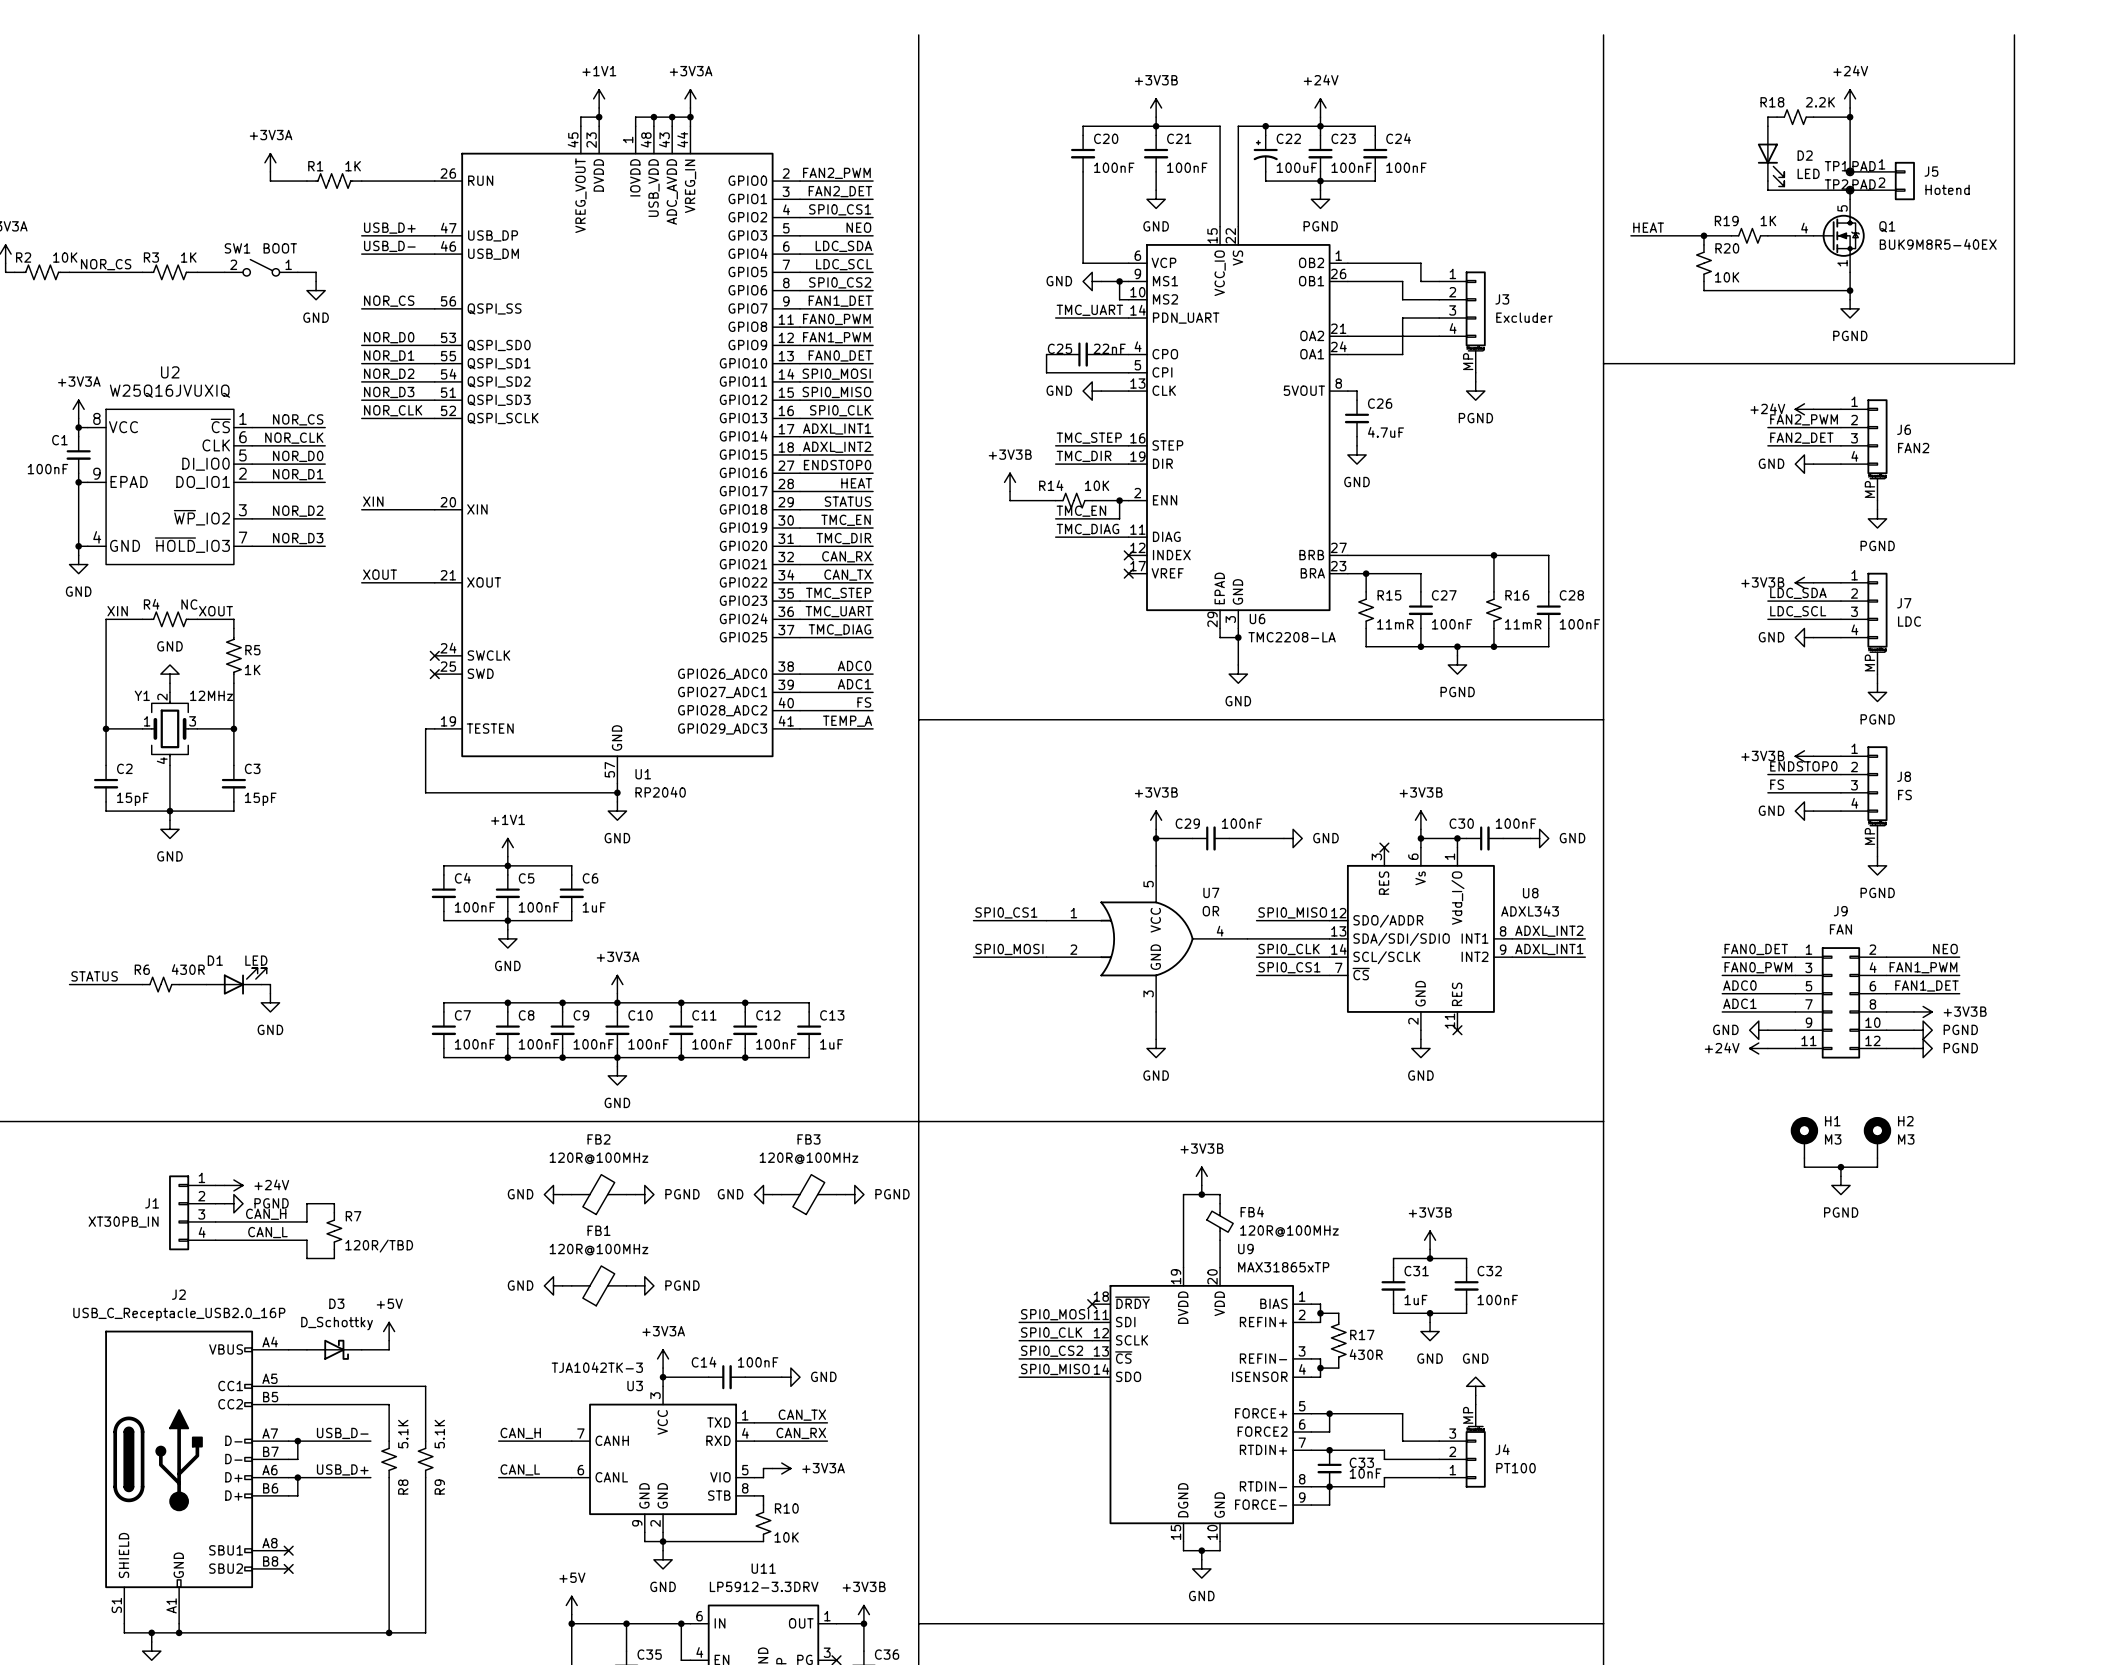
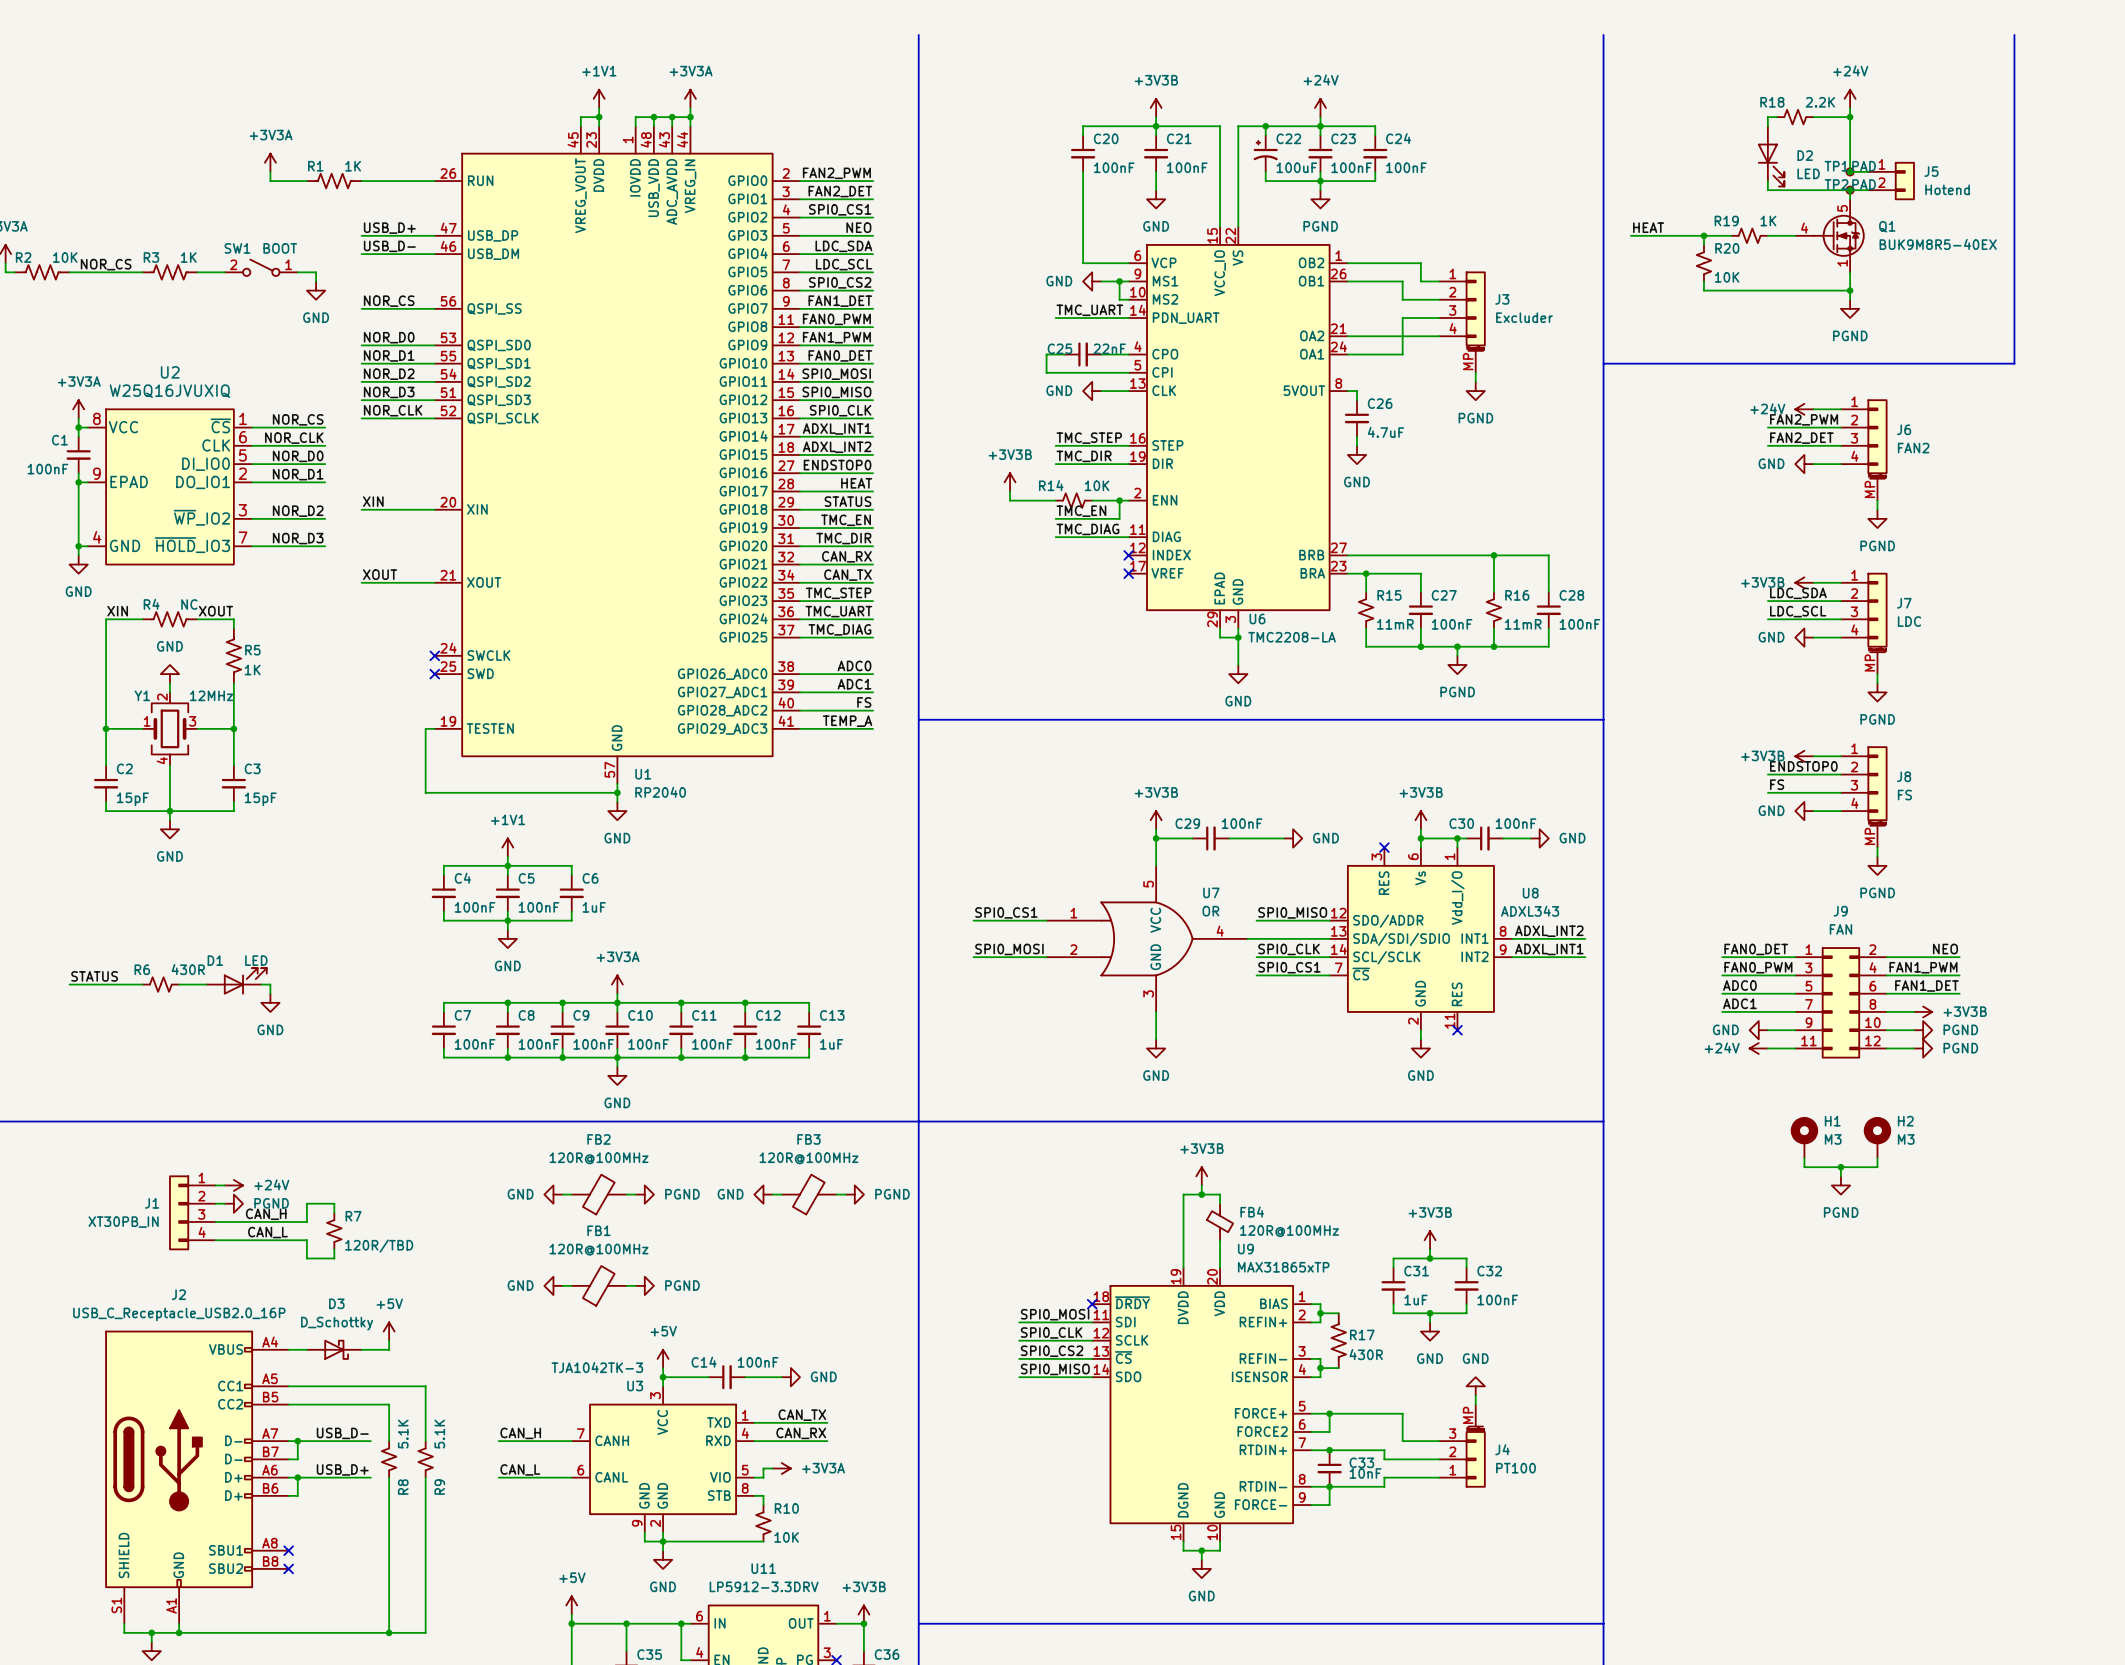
power symbol: +3V3A (663, 1358) -> +5V (663, 1358)

